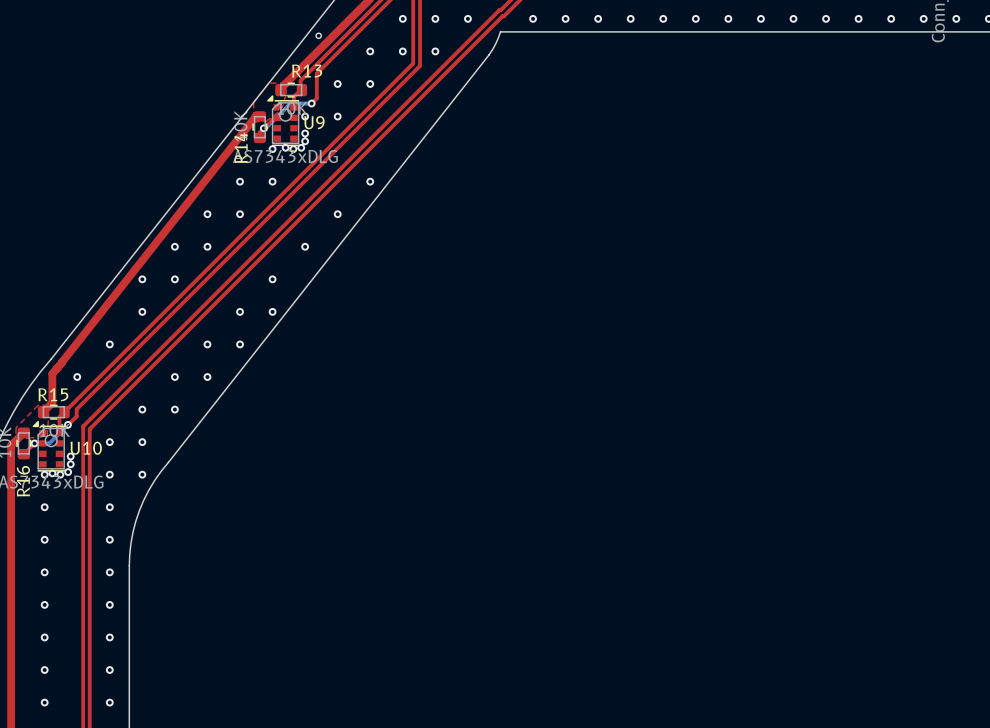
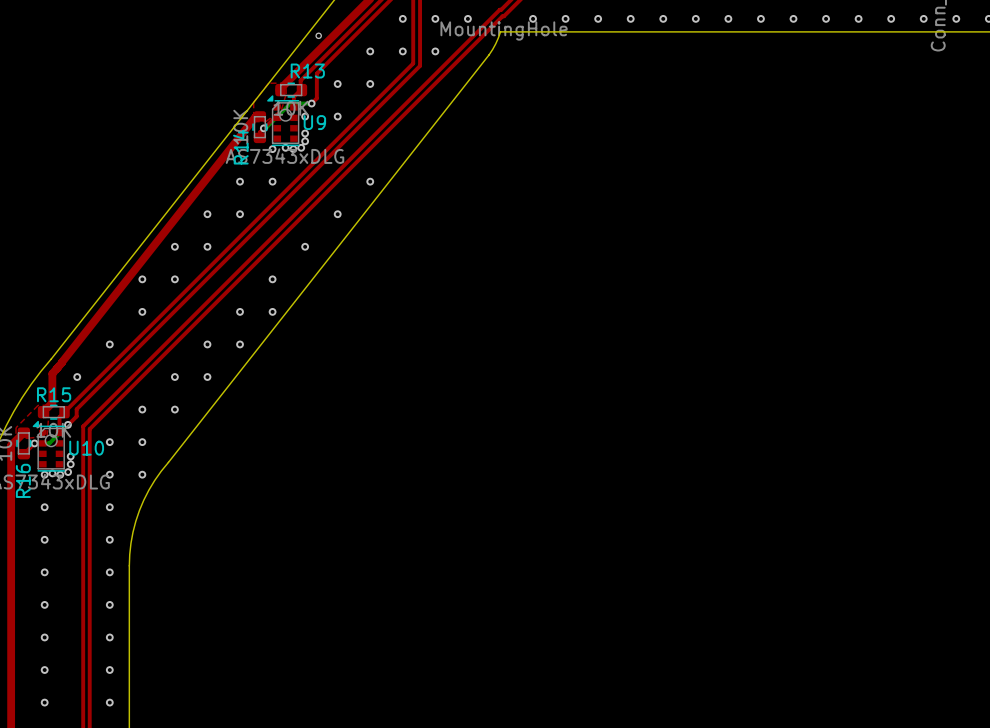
part value: none -> MountingHole (504, 30)

